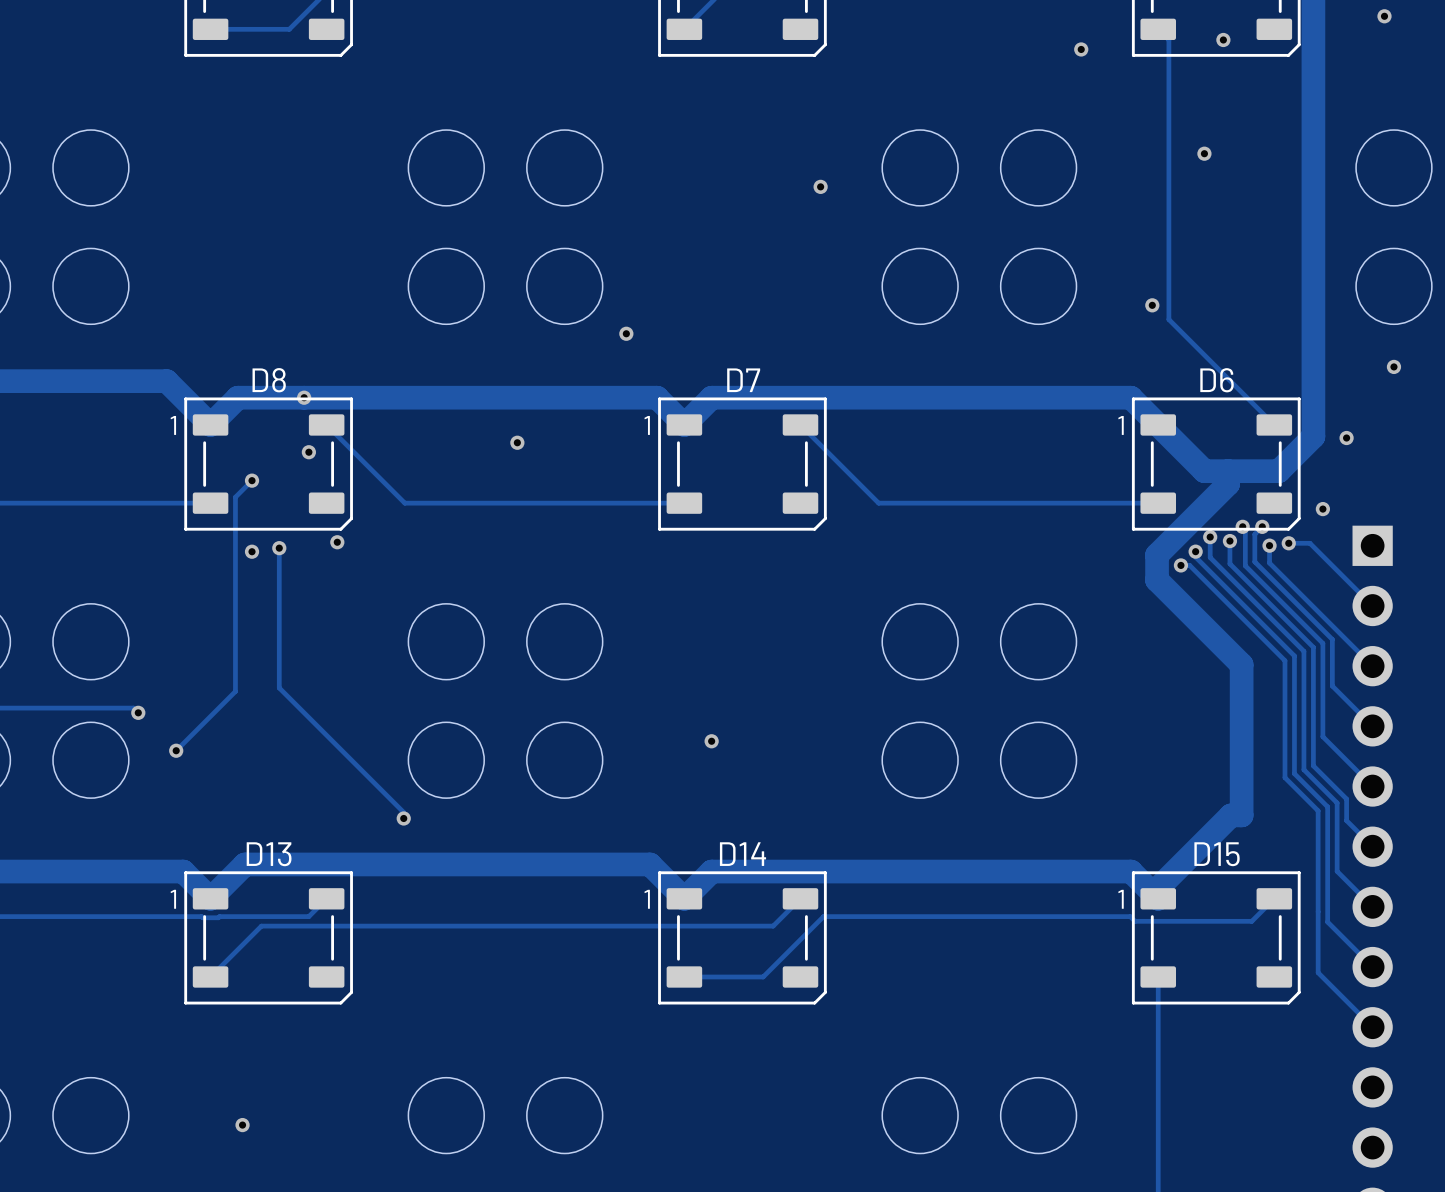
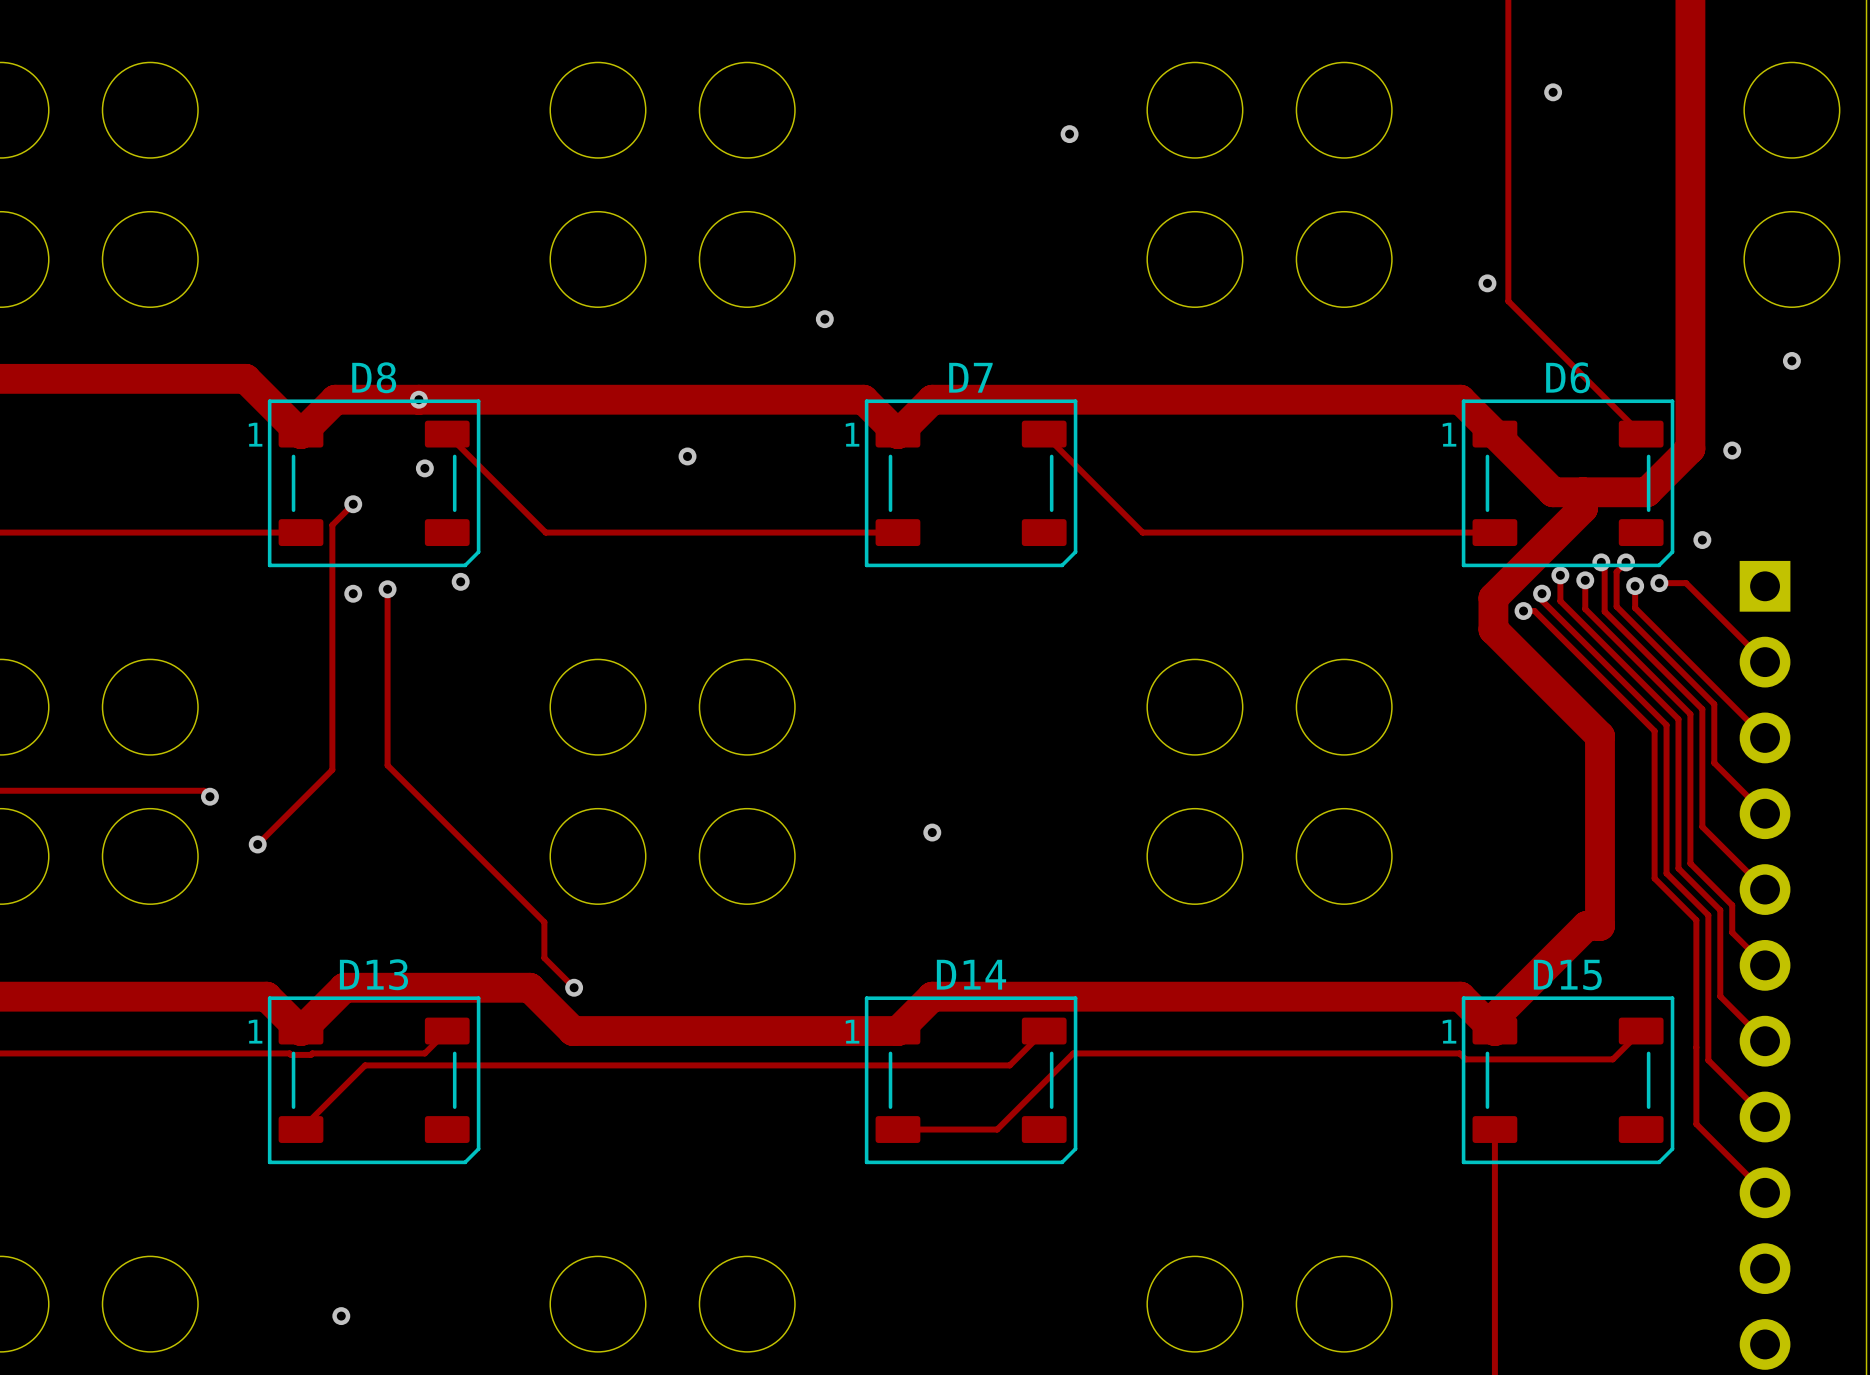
track: none -> (544, 929) (544, 958) (574, 987)
via position: (403, 818) -> (574, 987)
track: (392, 864) (650, 864) (684, 898) -> (529, 987) (573, 1031) (897, 1031)

